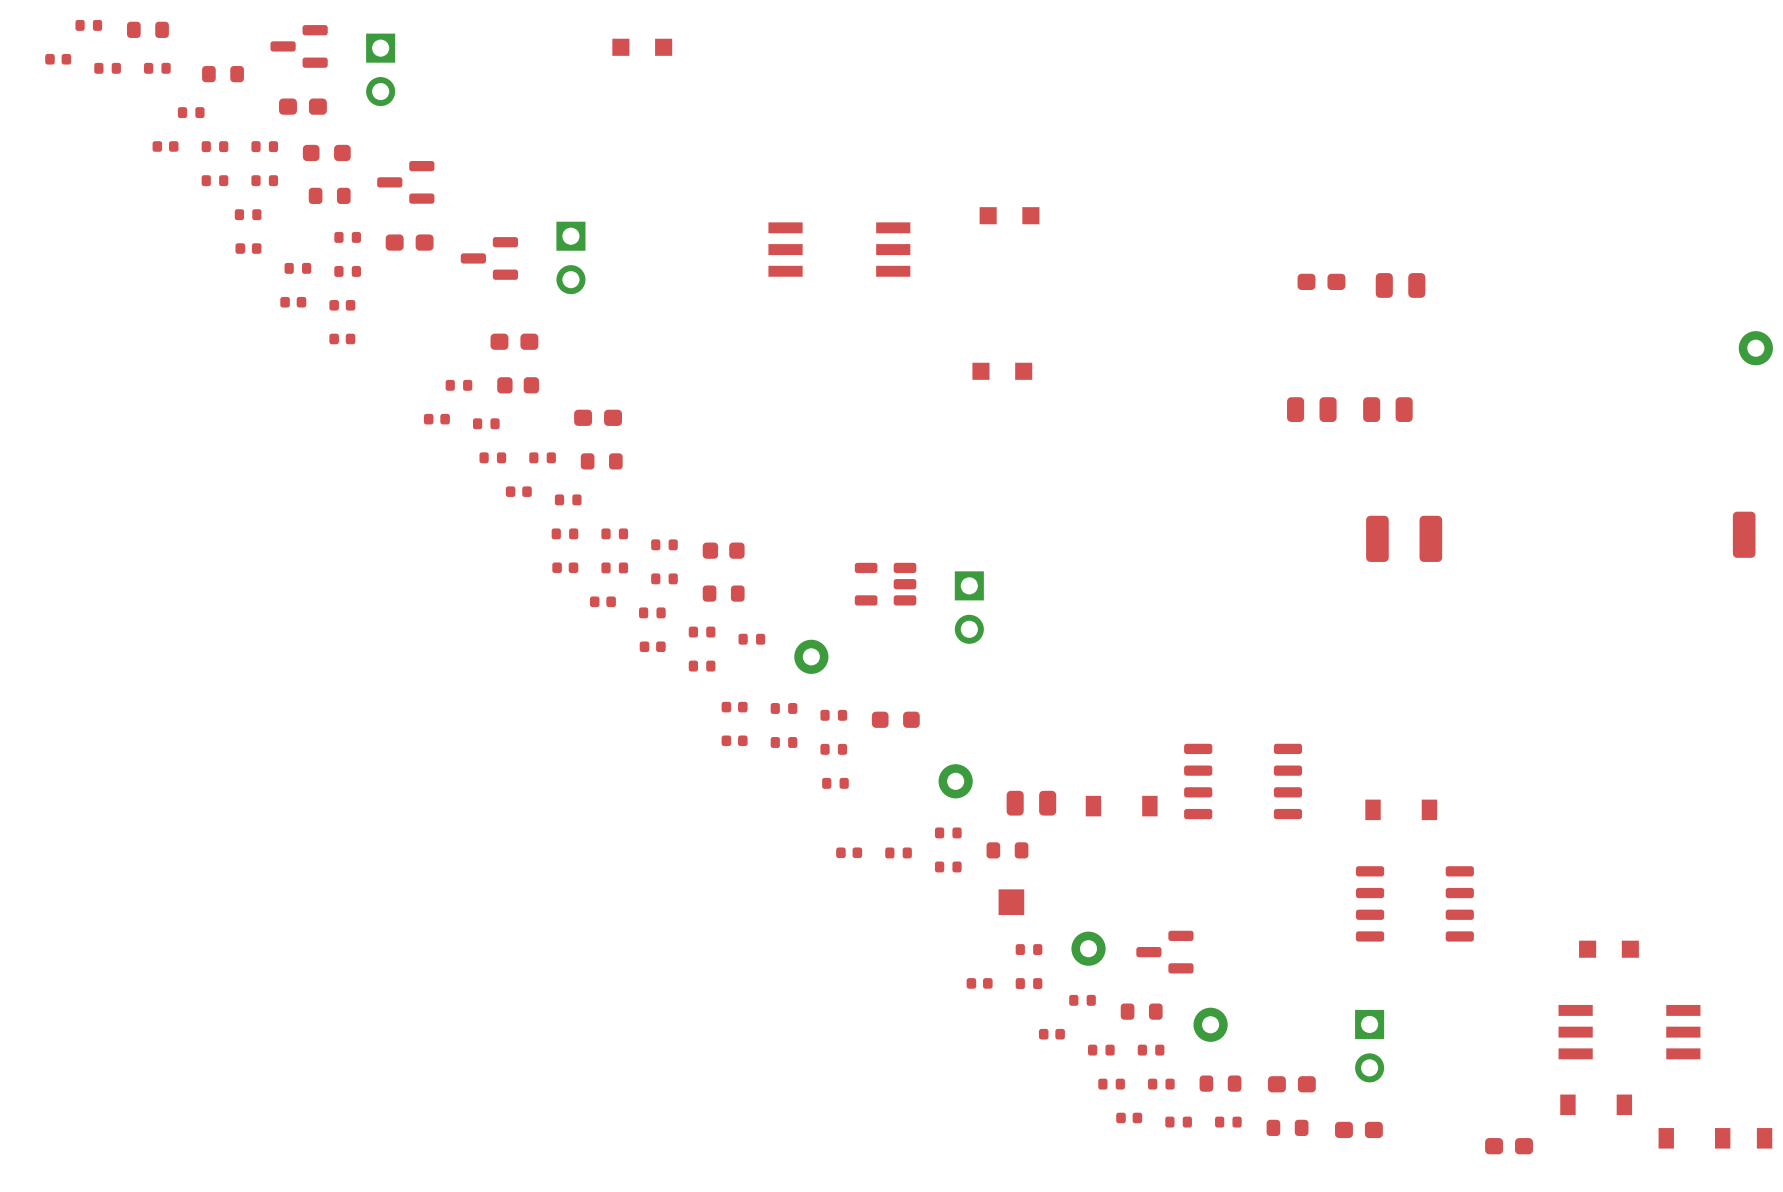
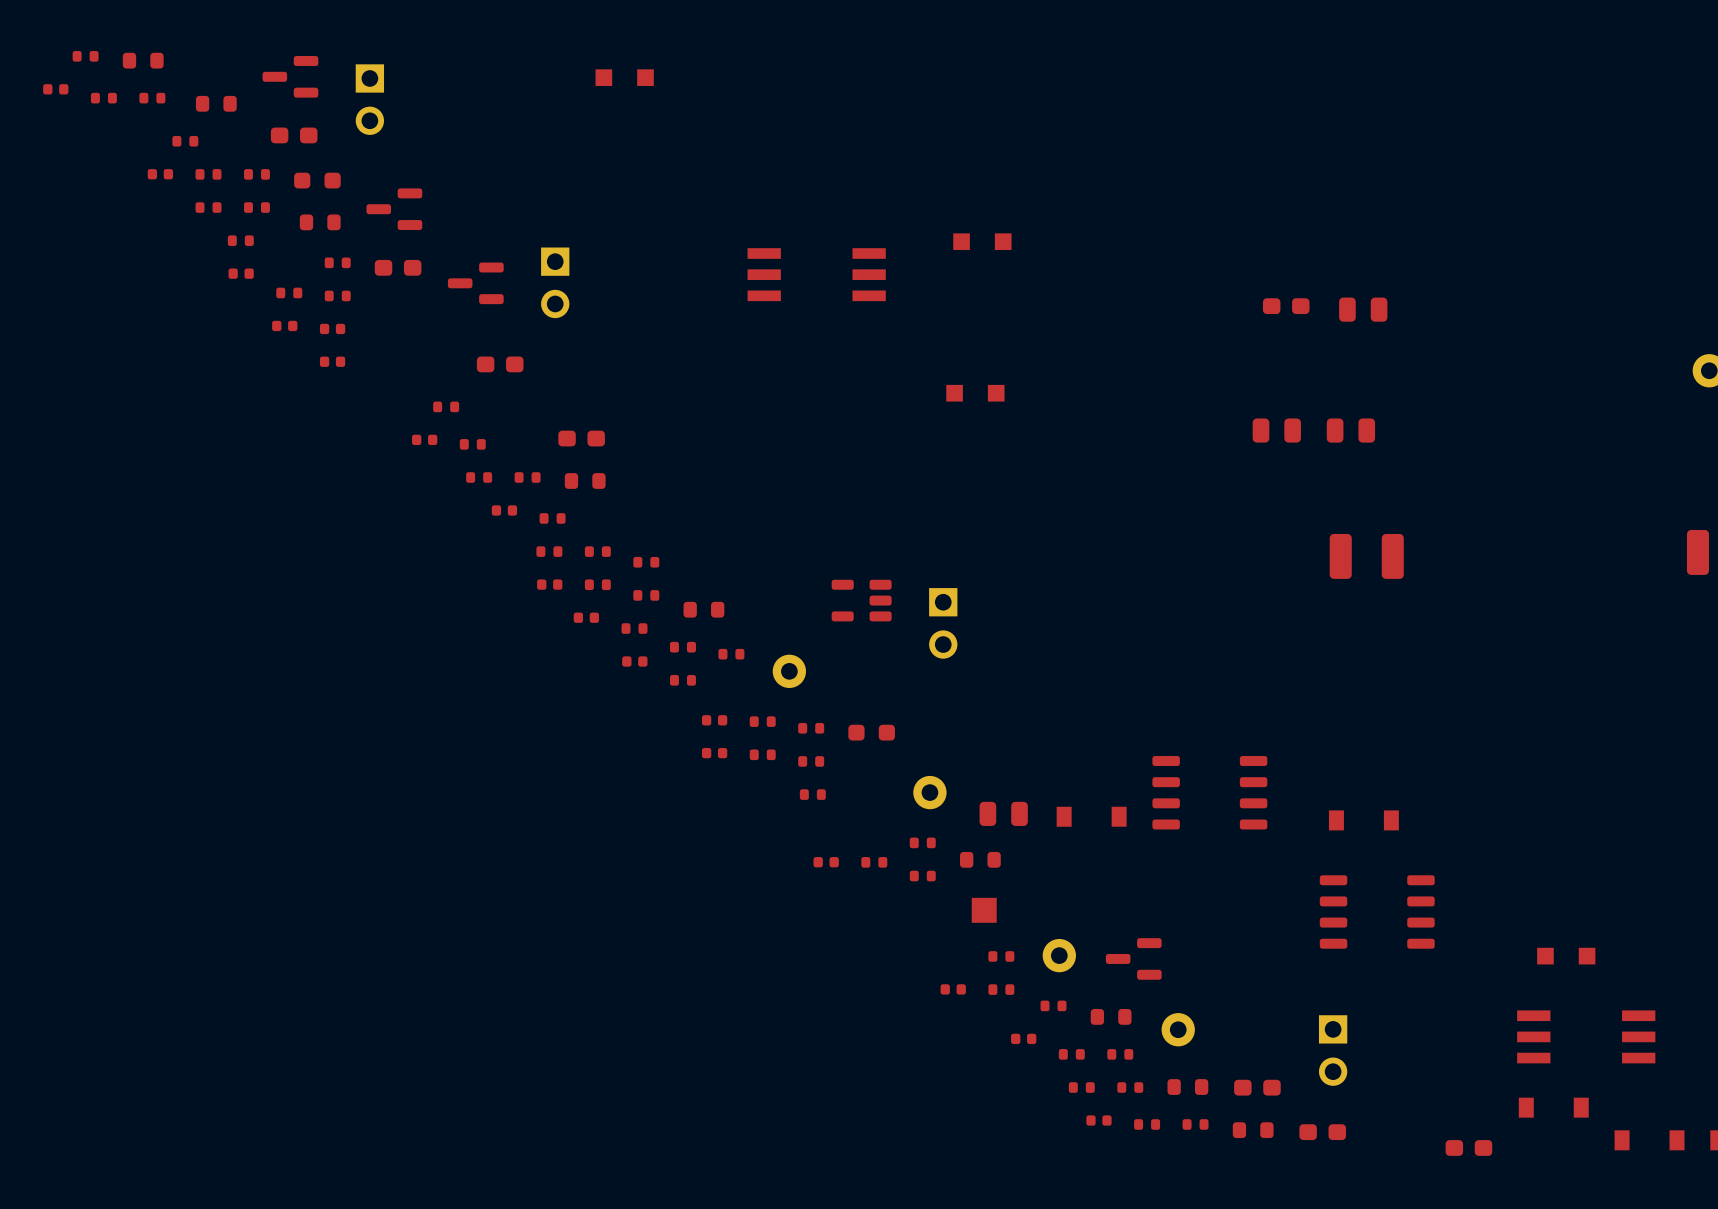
part: (518, 385) -> none
part: (723, 550) -> none

